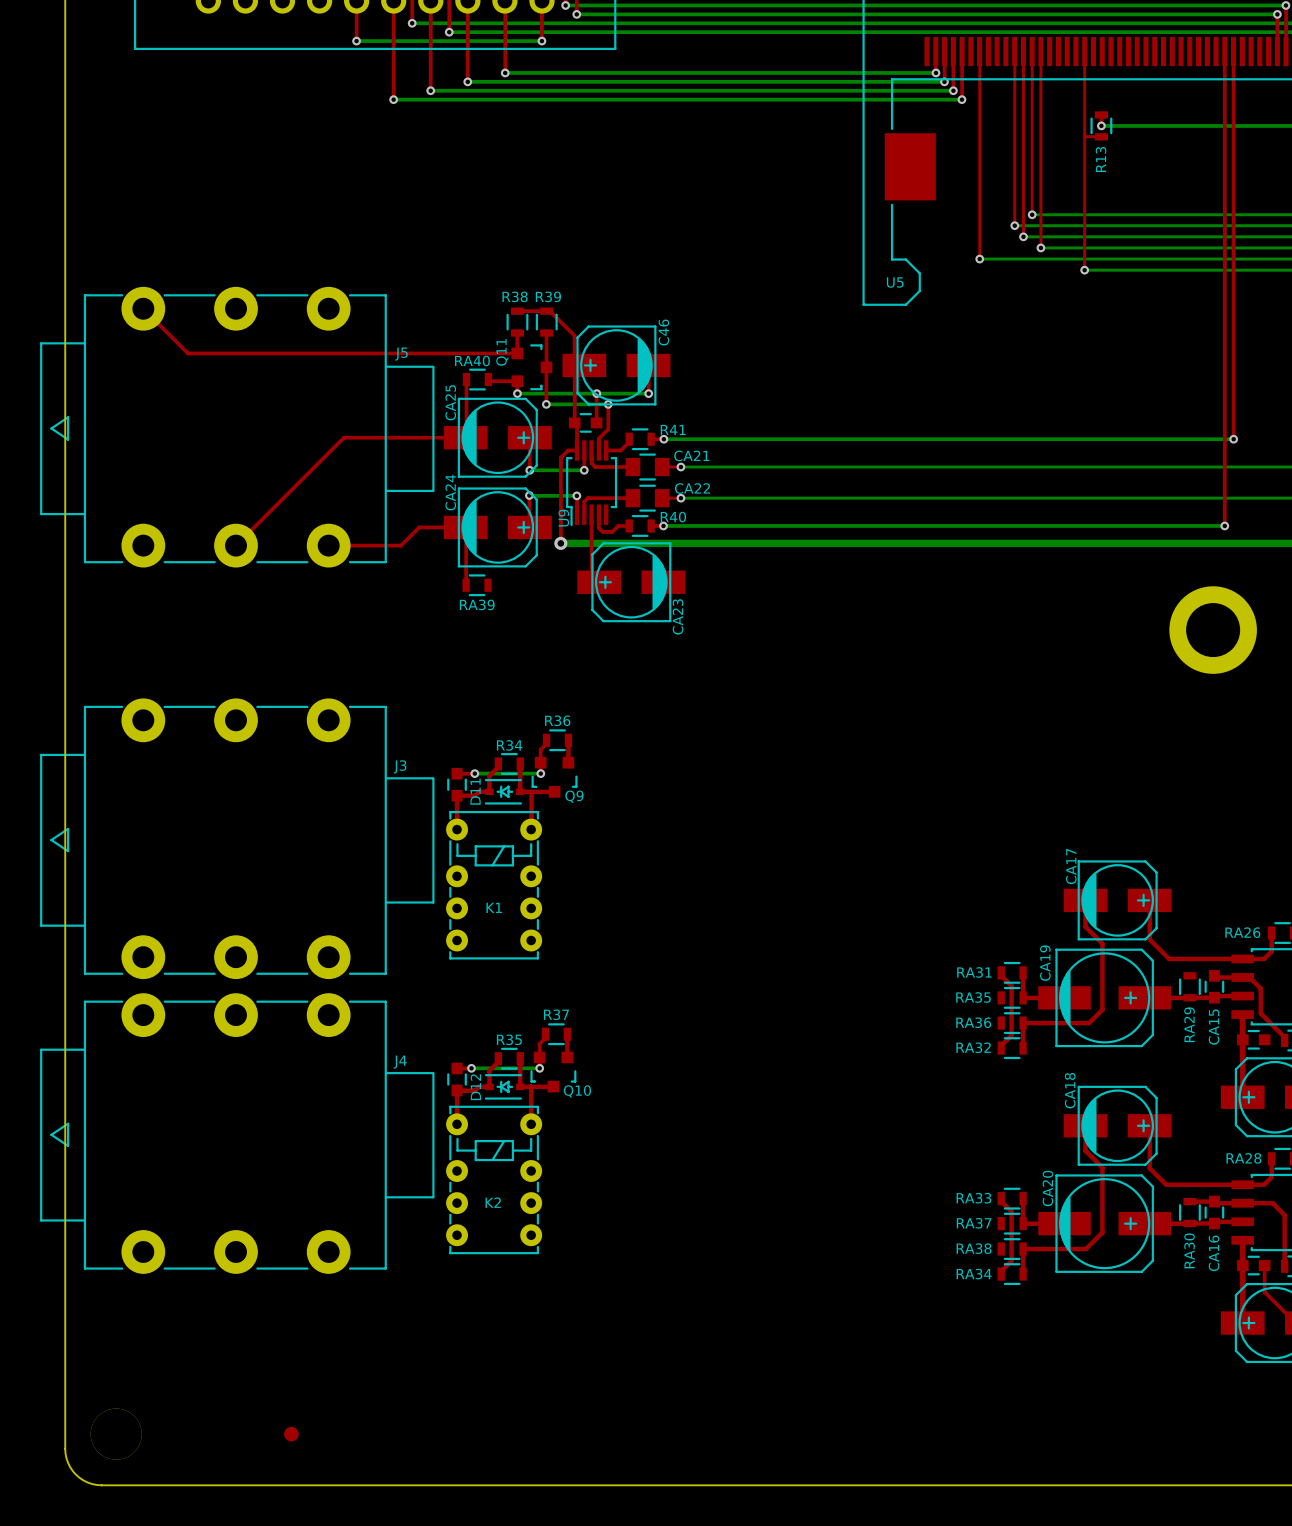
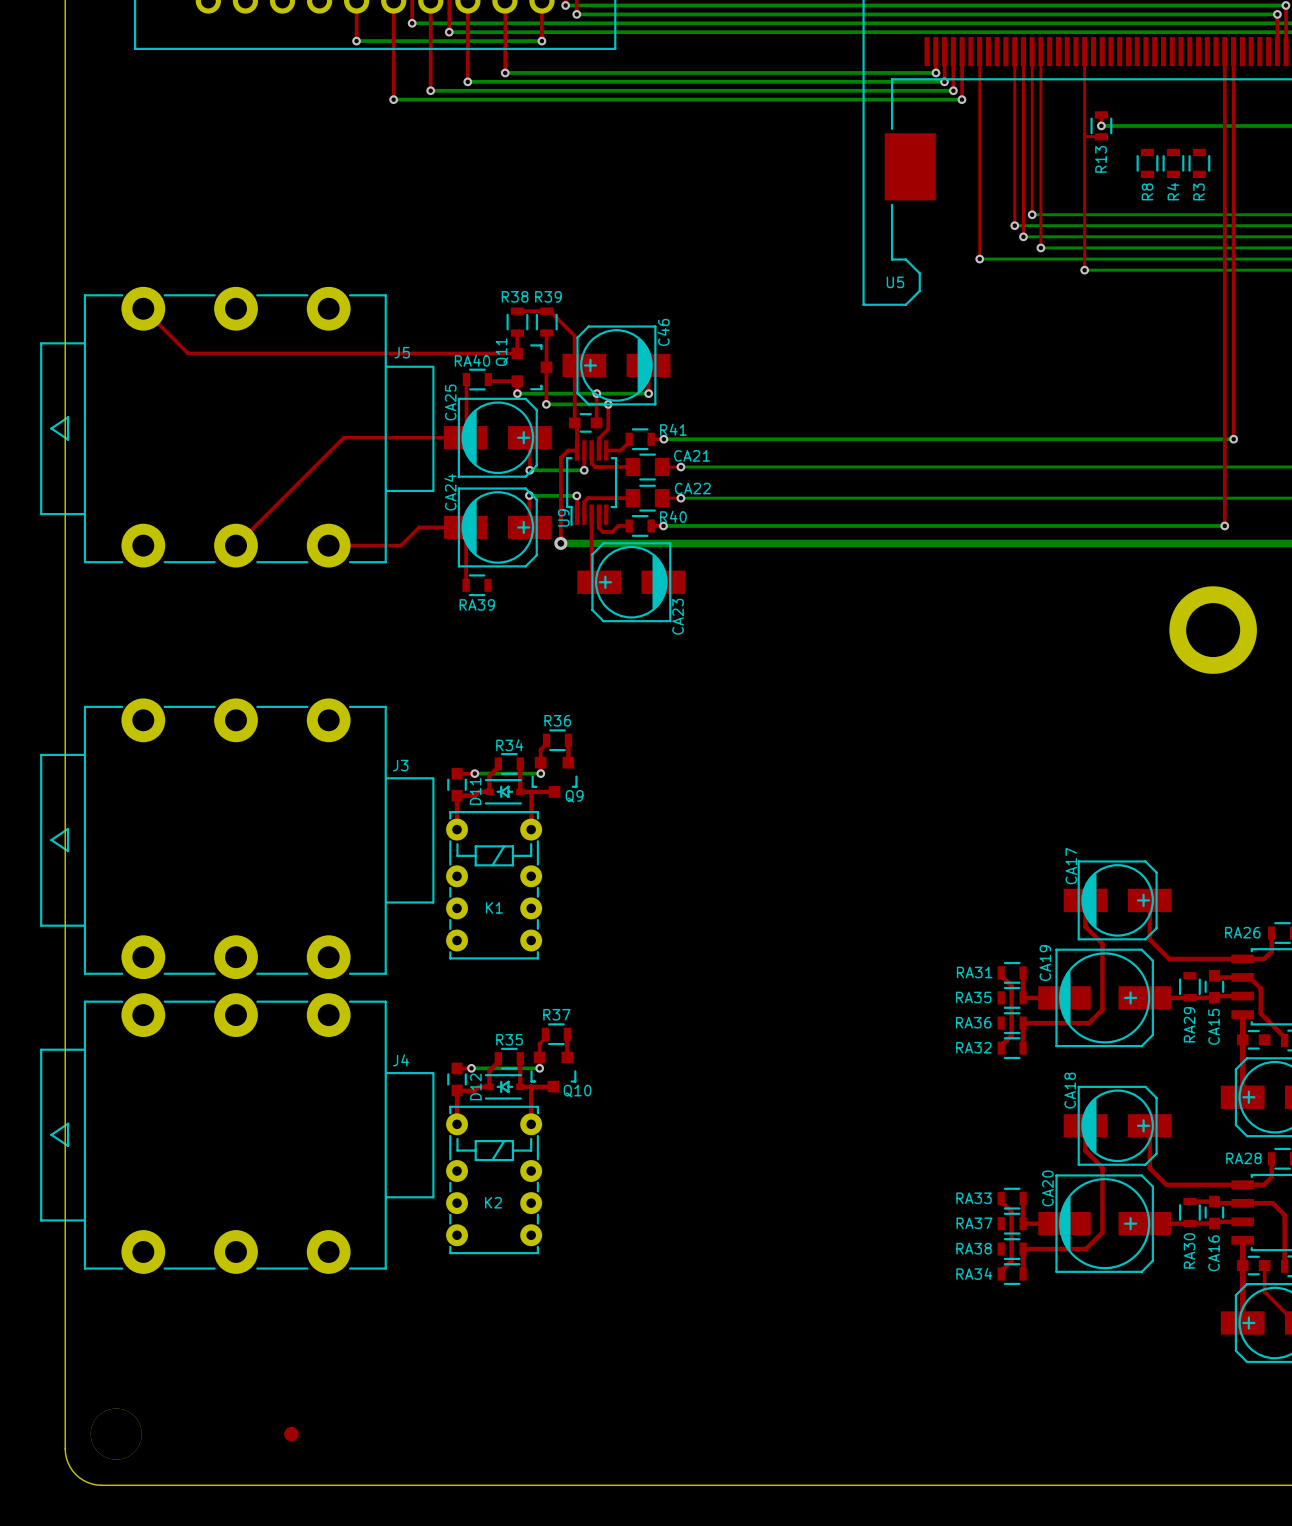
R8: none -> (1147, 163)
R4: none -> (1173, 163)
R3: none -> (1199, 163)

